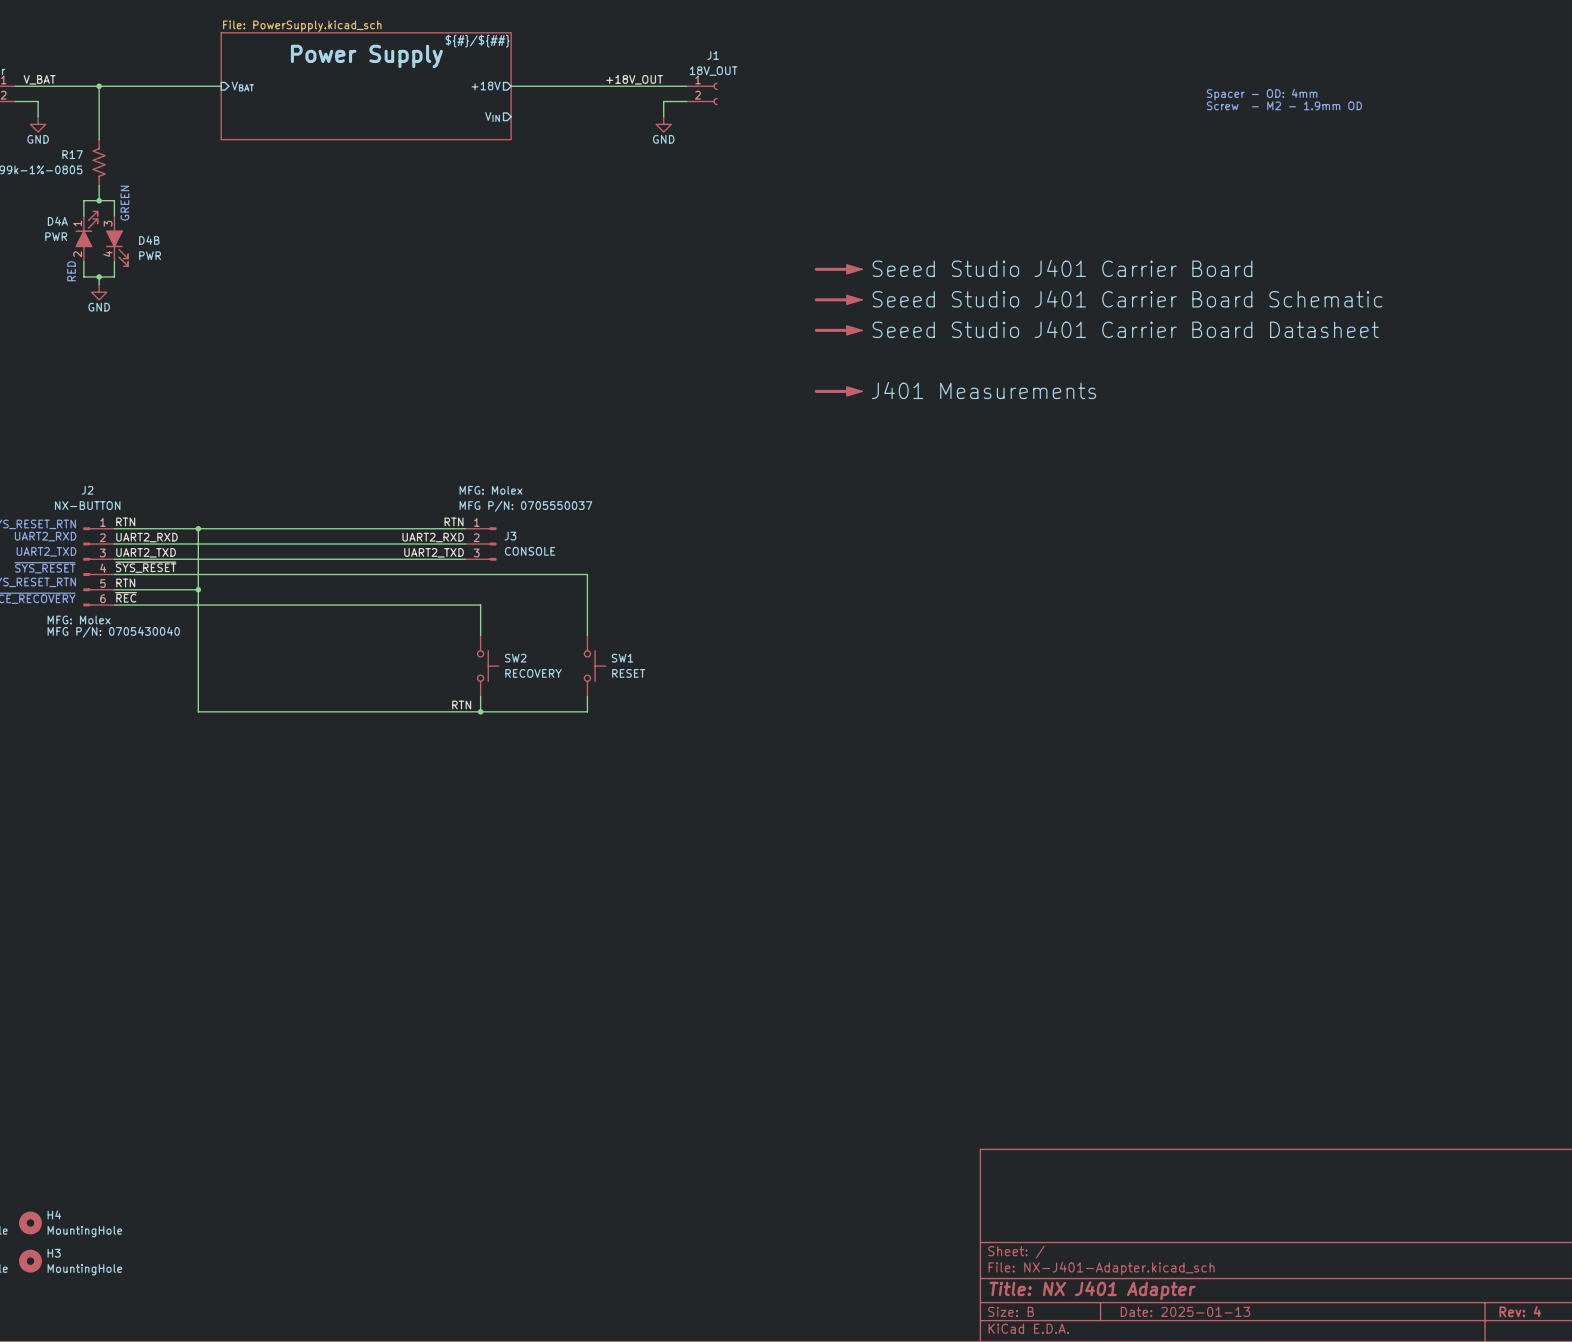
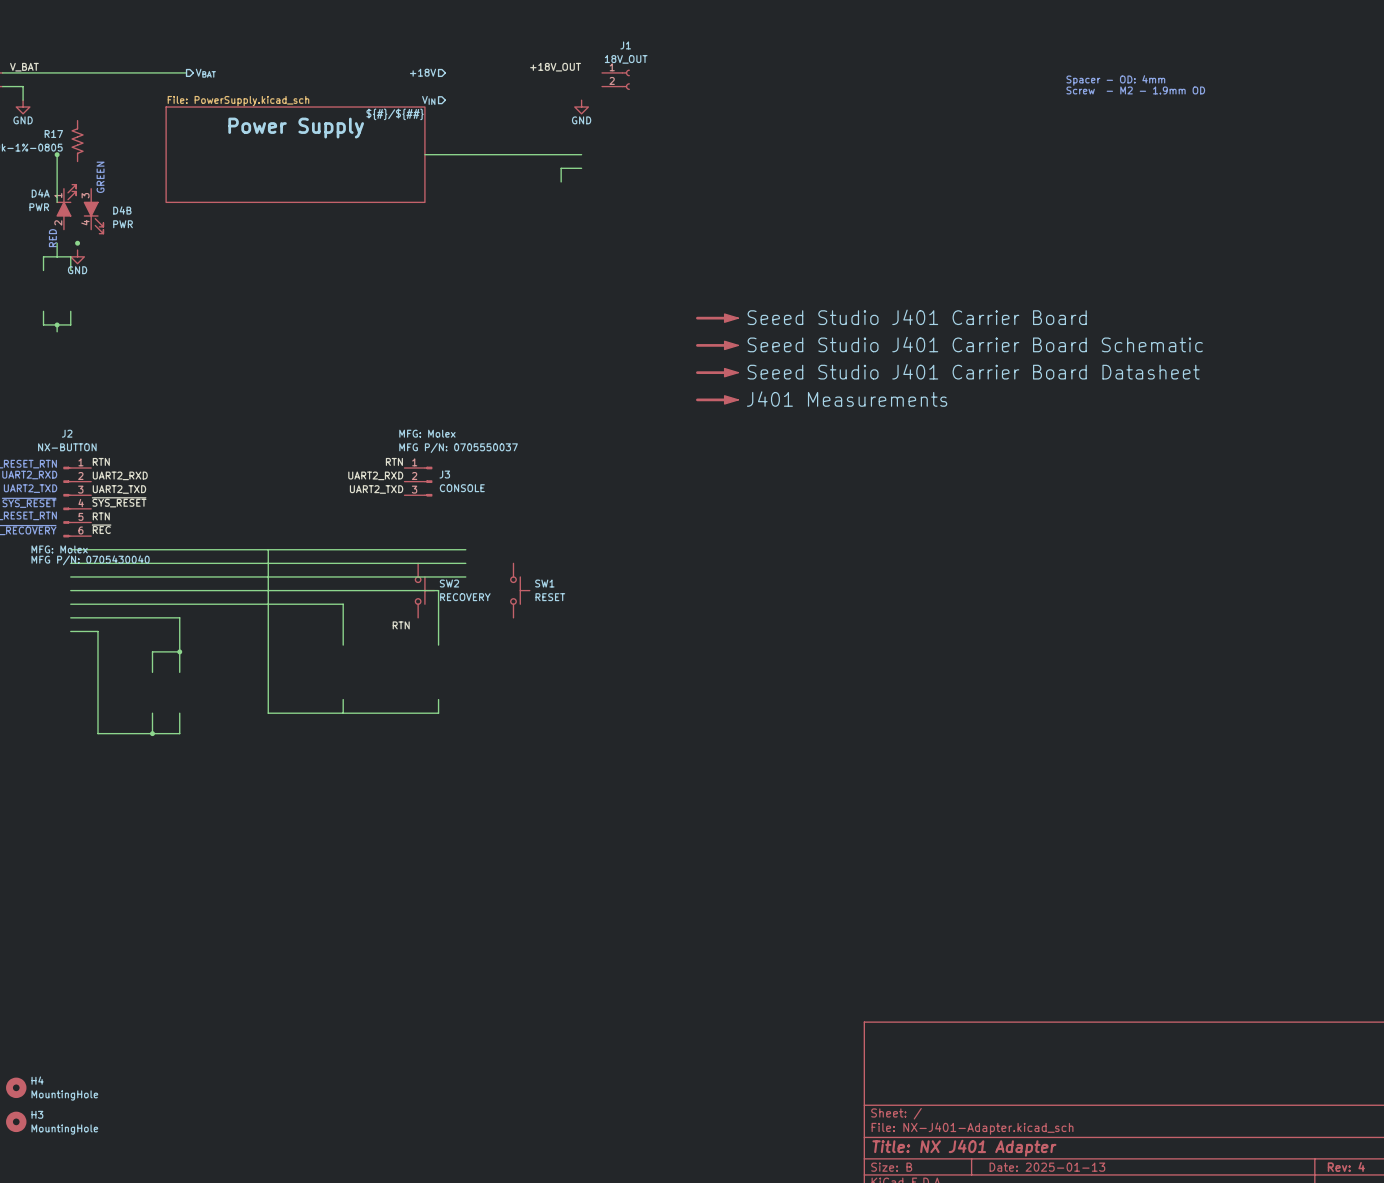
wire: (99, 86) (99, 139) -> (57, 154) (57, 202)
junction: (99, 86) -> none
sheet Power Supply position: (366, 86) -> (295, 154)
wire: (511, 86) (686, 86) -> (424, 154) (581, 154)
wire: (686, 101) (663, 101) (663, 116) -> (581, 168) (561, 168) (561, 181)
wire: (99, 185) (99, 200) -> (57, 243) (57, 256)
junction position: (99, 200) -> (57, 154)
wire: (83, 215) (83, 200) (114, 200) (114, 215) -> (43, 270) (43, 256) (70, 256) (70, 270)
wire: (83, 261) (83, 276) (114, 276) (114, 261) -> (43, 311) (43, 324) (70, 324) (70, 311)
power symbol position: Seeed Studio J401 Carrier Board (838, 269) -> Seeed Studio J401 Carrier Board (717, 318)
wire: (99, 276) (99, 284) -> (57, 324) (57, 331)
power symbol position: Seeed Studio J401 Carrier Board Schematic (838, 299) -> Seeed Studio J401 Carrier Board Schematic (717, 345)
power symbol position: Seeed Studio J401 Carrier Board Datasheet (838, 330) -> Seeed Studio J401 Carrier Board Datasheet (717, 372)
junction: none -> (57, 324)
power symbol position: J401 Measurements (838, 391) -> J401 Measurements (717, 399)
wire: (114, 528) (465, 528) -> none
wire: (198, 528) (198, 711) (587, 711) (587, 696) -> none
junction: (198, 528) -> none
wire: (114, 544) (465, 544) -> none
wire: (114, 559) (465, 559) -> none
wire: (114, 574) (587, 574) (587, 635) -> none
wire: (114, 589) (198, 589) -> none
junction: (198, 589) -> none
wire: (114, 605) (480, 605) (480, 635) -> none
wire: none -> (70, 549) (465, 549)
wire: none -> (268, 549) (268, 713) (438, 713) (438, 699)
wire: none -> (70, 563) (465, 563)
wire: none -> (70, 576) (465, 576)
wire: none -> (70, 590) (438, 590) (438, 645)
wire: none -> (70, 604) (343, 604) (343, 645)
wire: none -> (70, 617) (179, 617) (179, 672)
wire: (480, 696) (480, 711) -> (343, 699) (343, 713)
wire: none -> (70, 631) (97, 631) (97, 733) (179, 733) (179, 713)
junction: (480, 711) -> none
wire: none -> (179, 651) (152, 651) (152, 672)
junction: none -> (179, 651)
wire: none -> (152, 713) (152, 733)
junction: none -> (152, 733)

